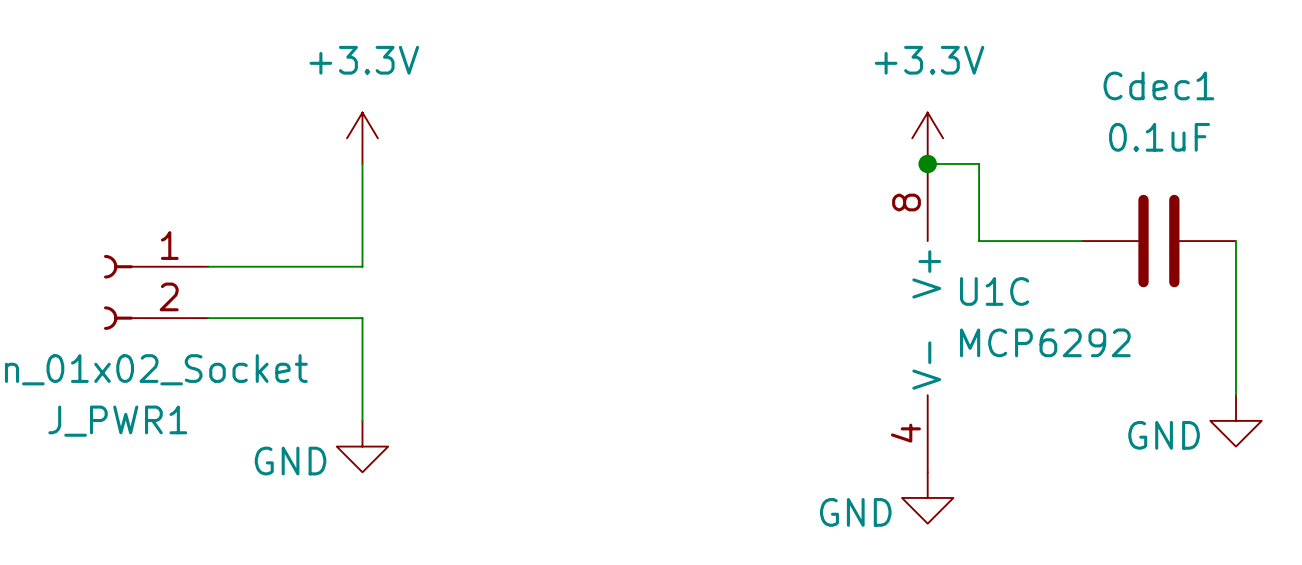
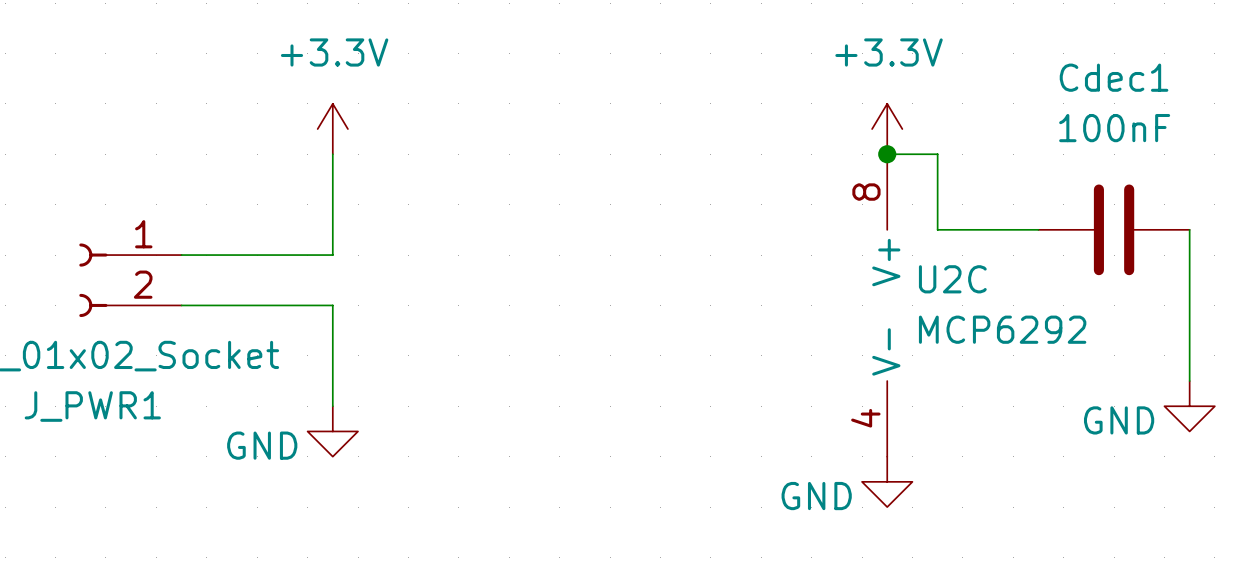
Cdec1 value: 0.1uF (1159, 137) -> 100nF (1114, 128)
U1C name: U1C (994, 291) -> U2C (952, 279)

